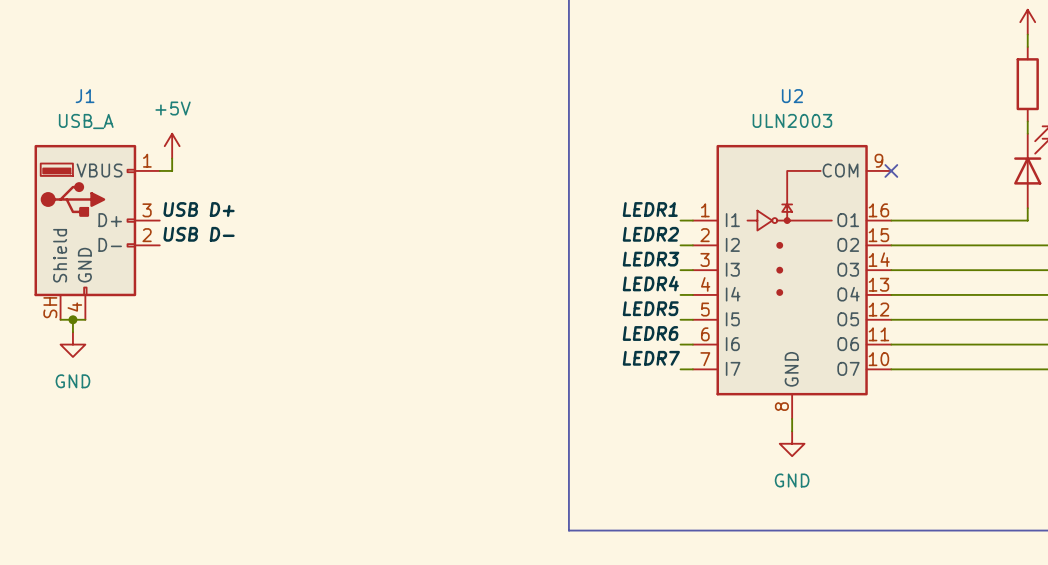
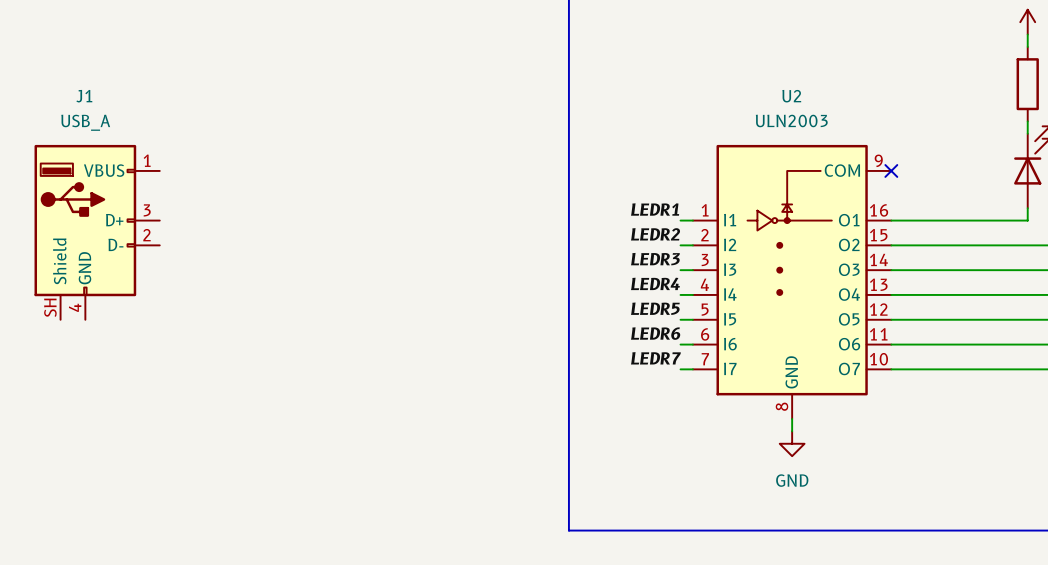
power symbol: +5V (172, 146) -> none
wire: (172, 158) (172, 170) (159, 170) -> none
label: USB D+ (199, 209) -> none
label: USB D- (199, 234) -> none
wire: (60, 319) (85, 319) -> none
wire: (72, 319) (72, 332) -> none
junction: (72, 319) -> none
power symbol: GND (72, 344) -> none

